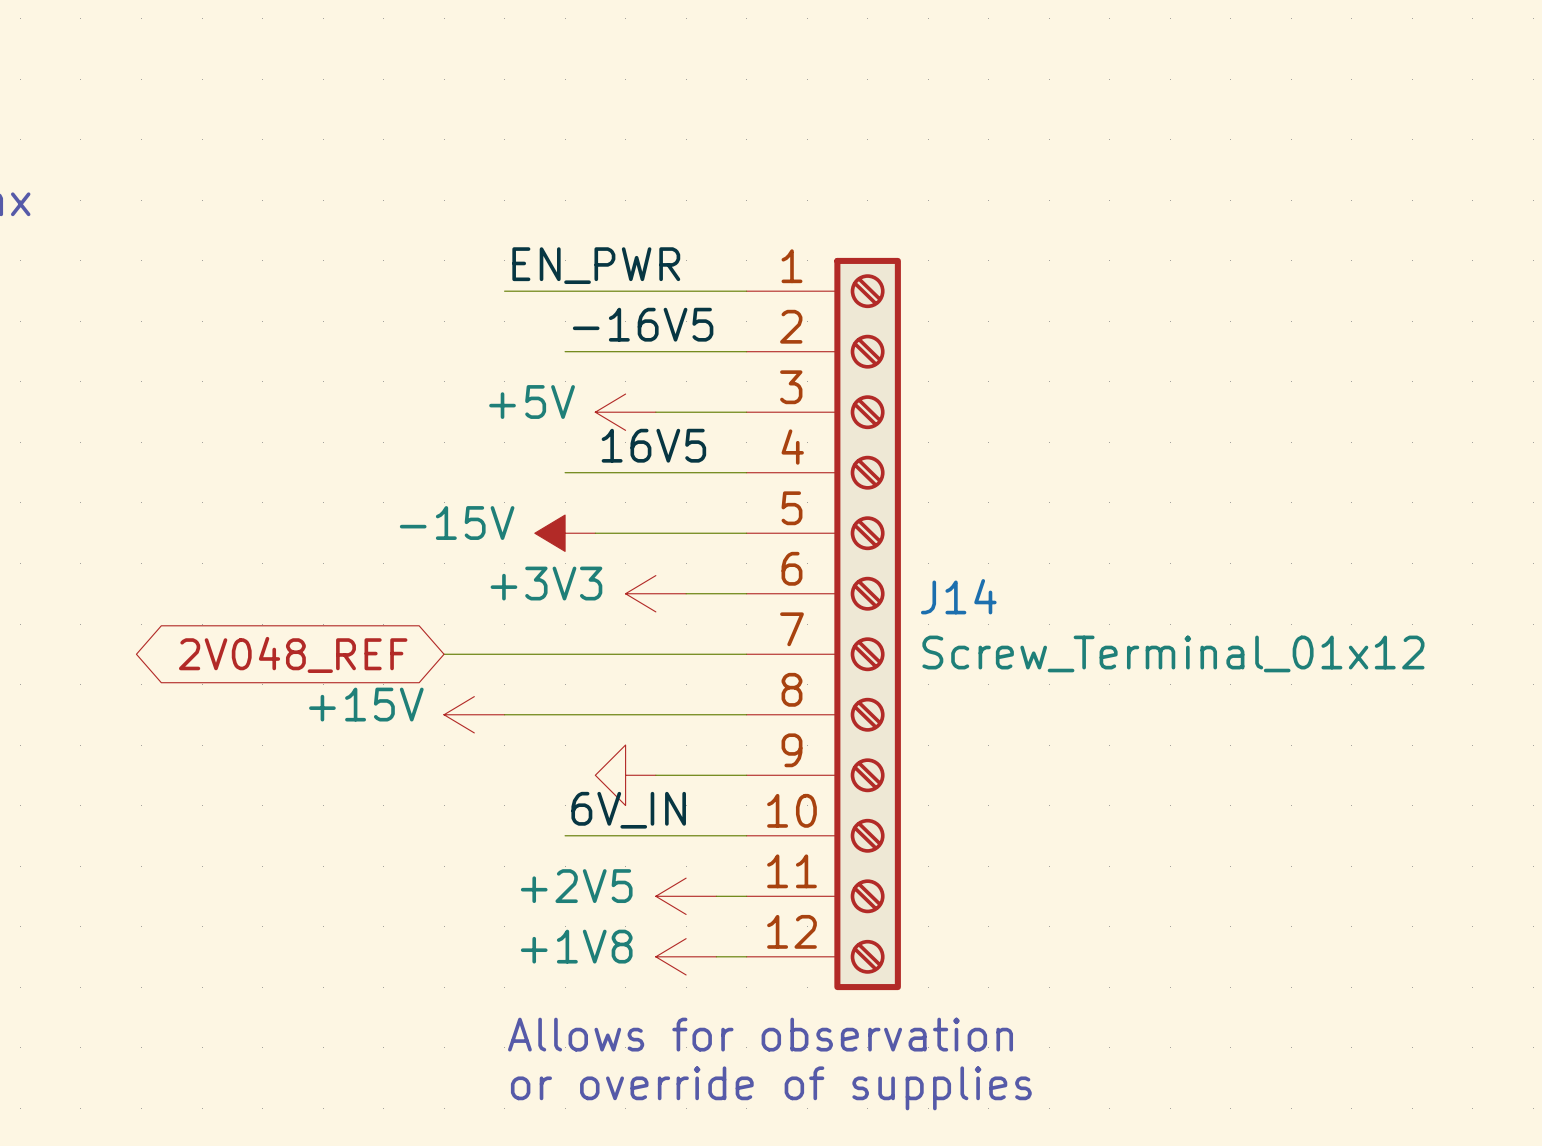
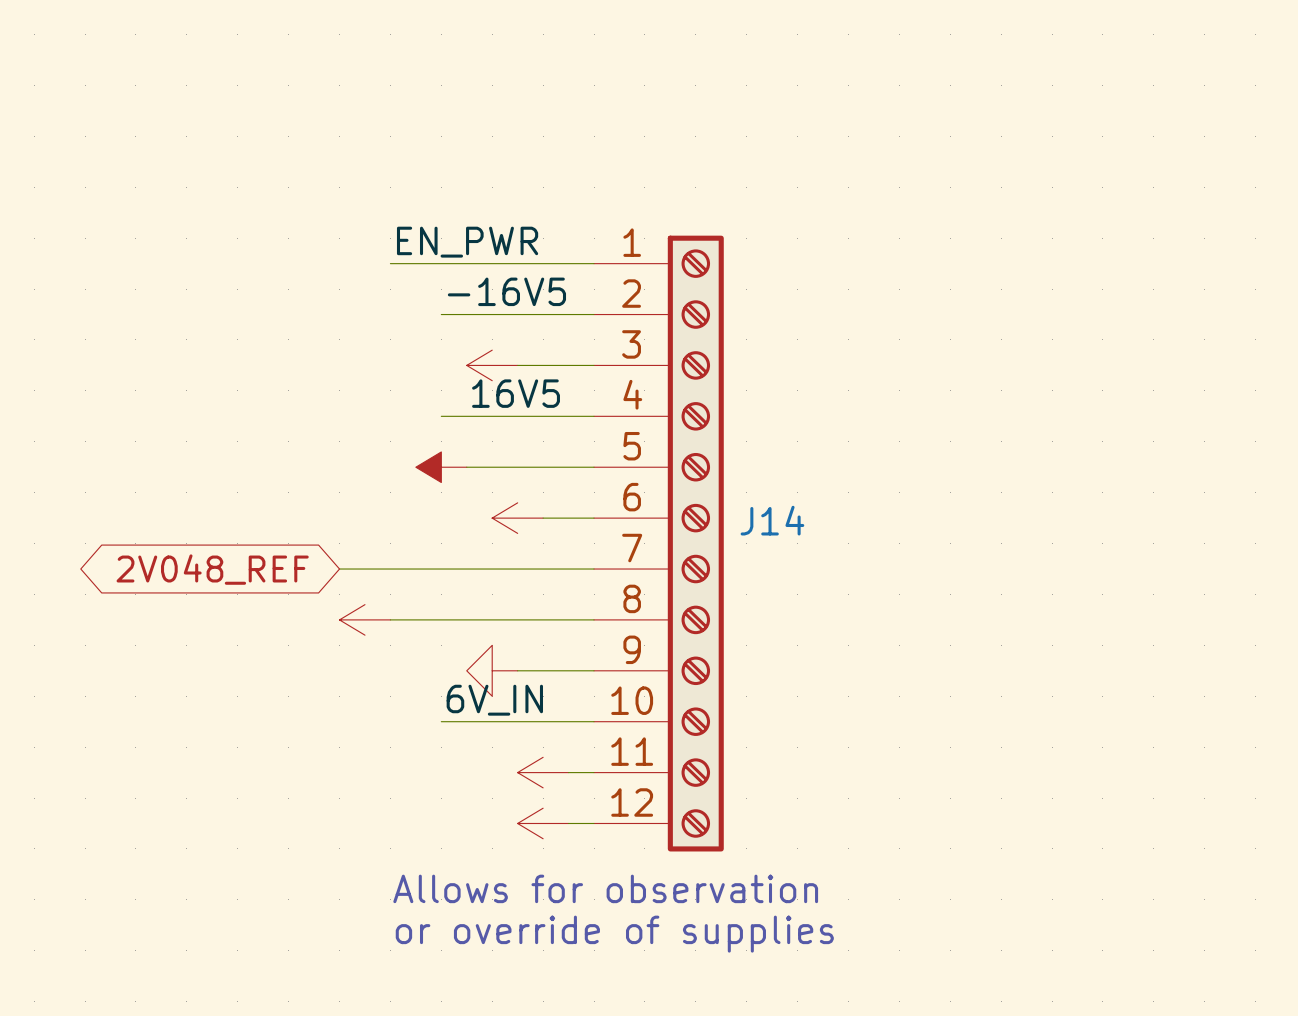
power symbol text: +5V (532, 402) -> none
power symbol text: -15V (457, 523) -> none
power symbol text: +3V3 (546, 583) -> none
J14 value: Screw_Terminal_01x12 (1173, 653) -> none
power symbol text: +15V (366, 704) -> none
power symbol text: +2V5 (576, 886) -> none
power symbol text: +1V8 (576, 946) -> none

